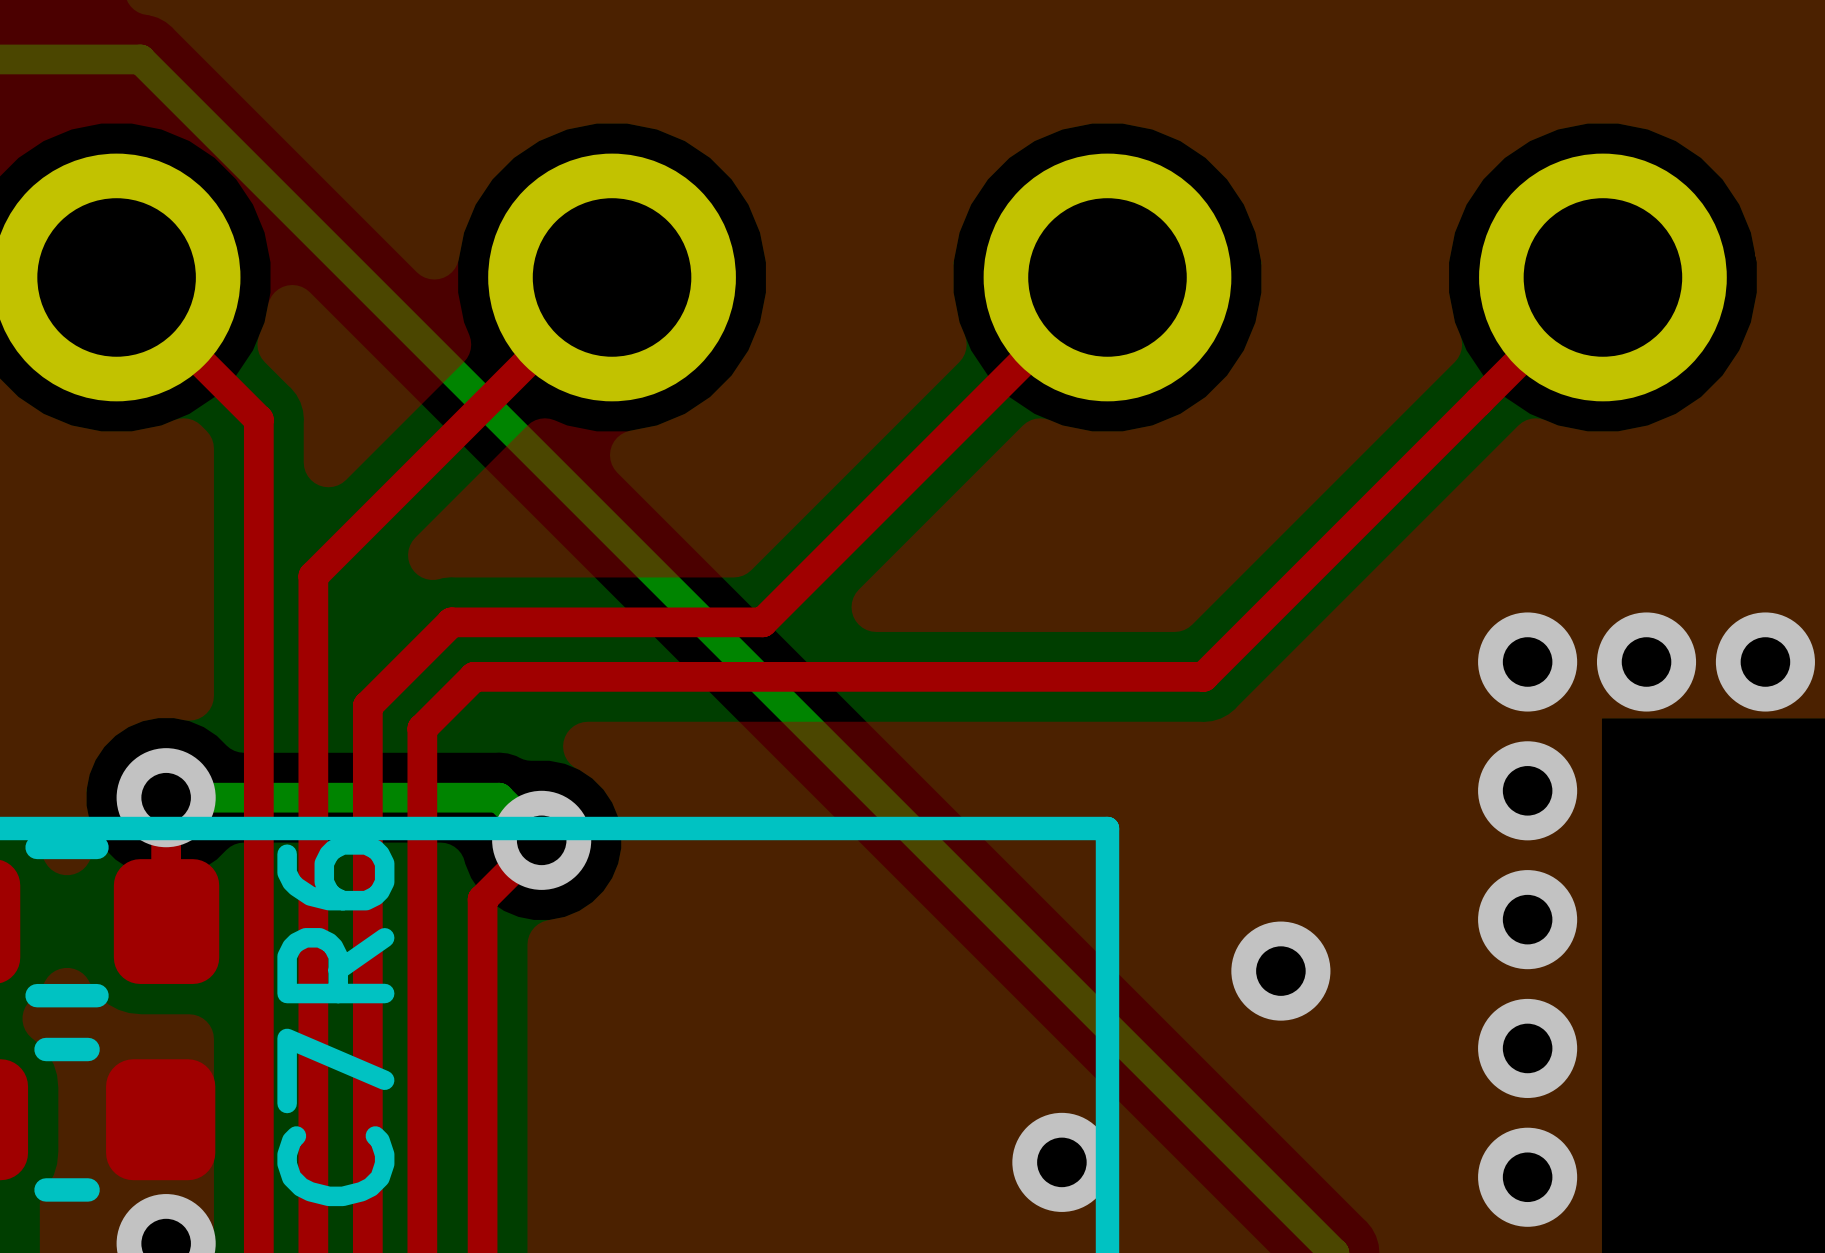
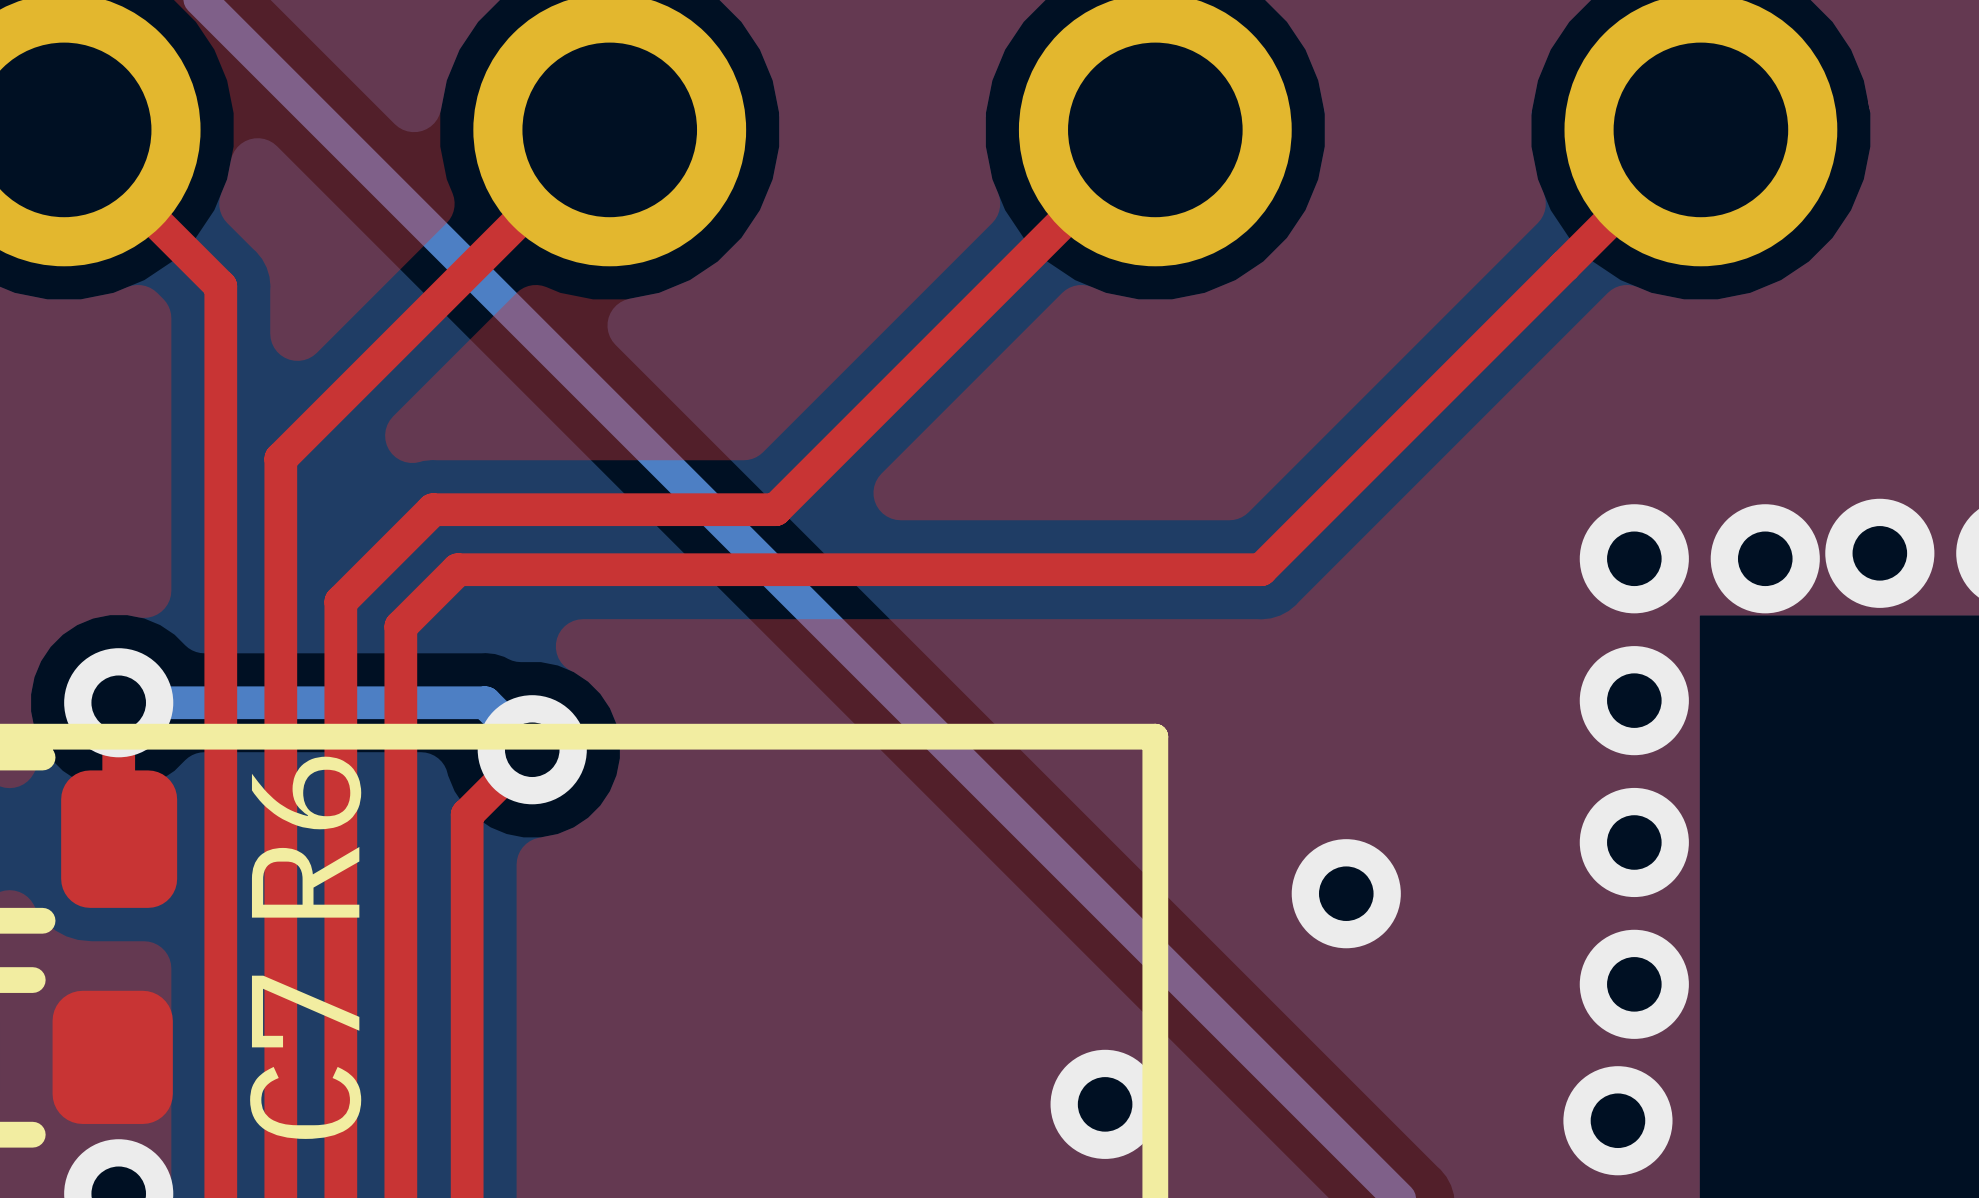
via position: (1527, 662) -> (1634, 558)
via position: (1646, 662) -> (1765, 558)
via position: (1527, 790) -> (1634, 700)
via position: (1527, 919) -> (1634, 842)
via position: (1527, 1048) -> (1634, 984)

